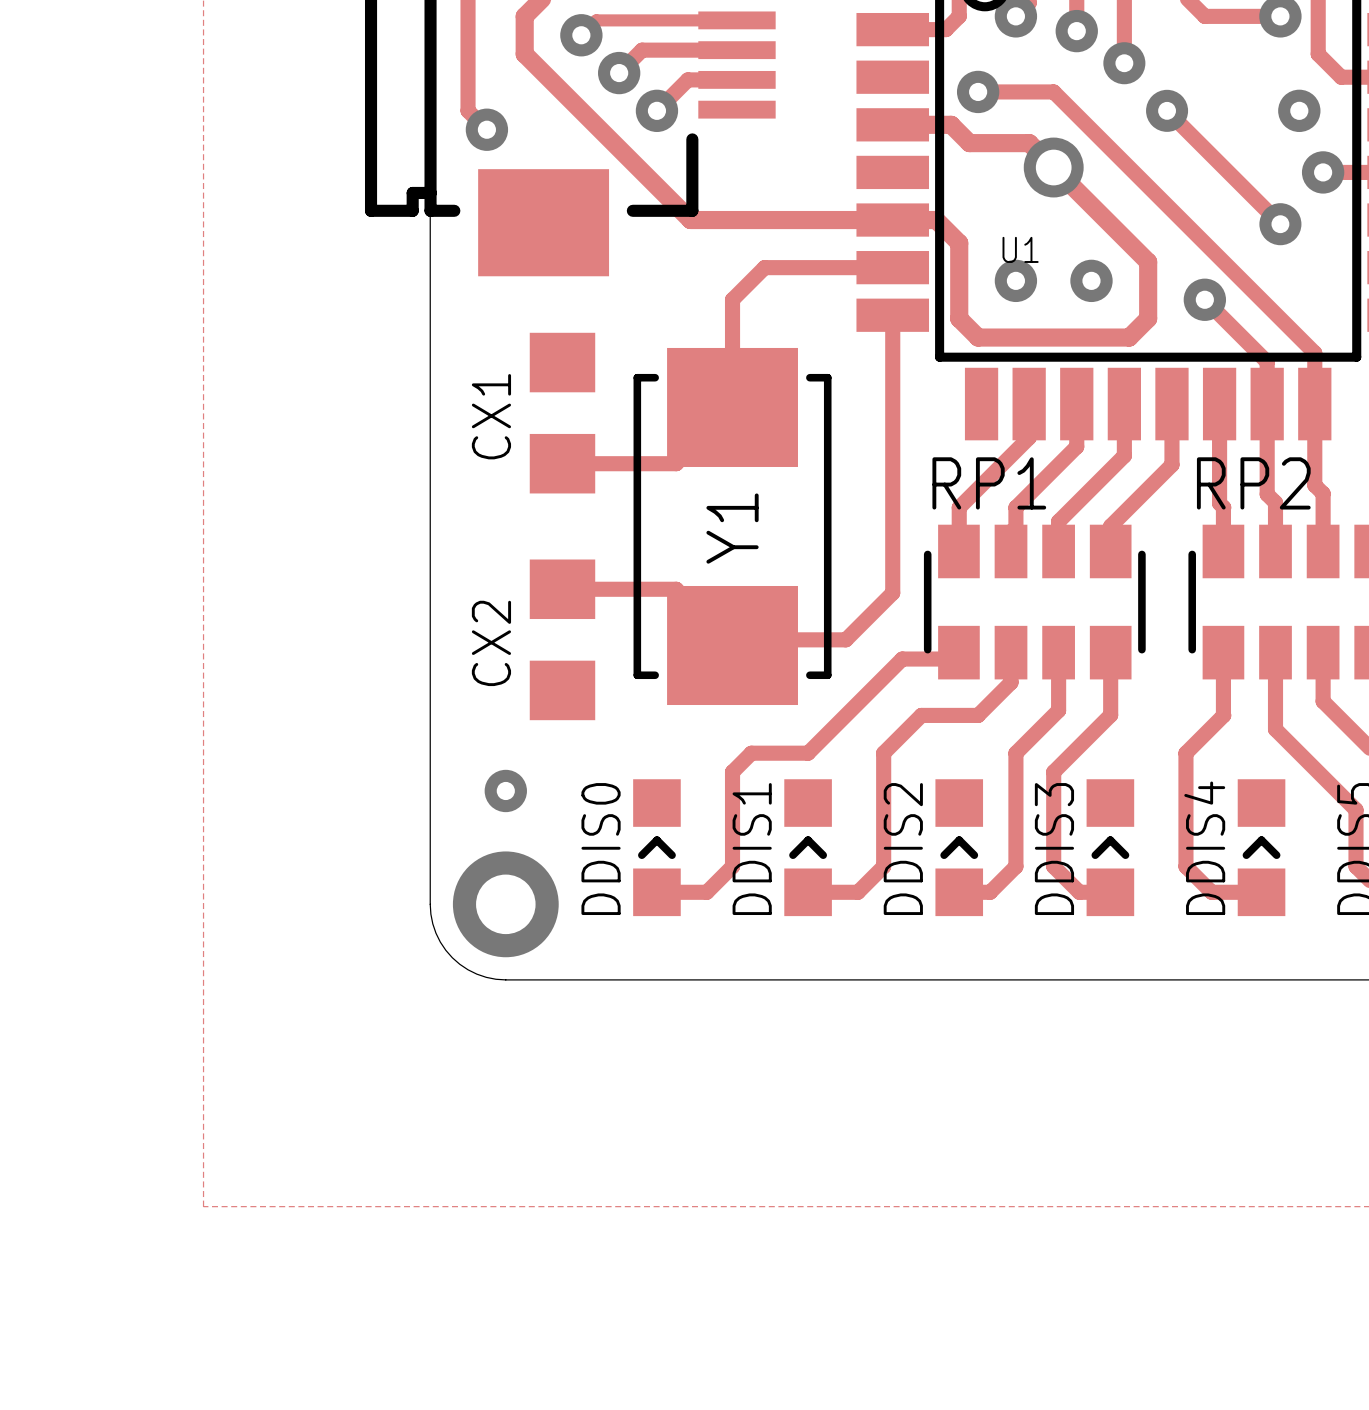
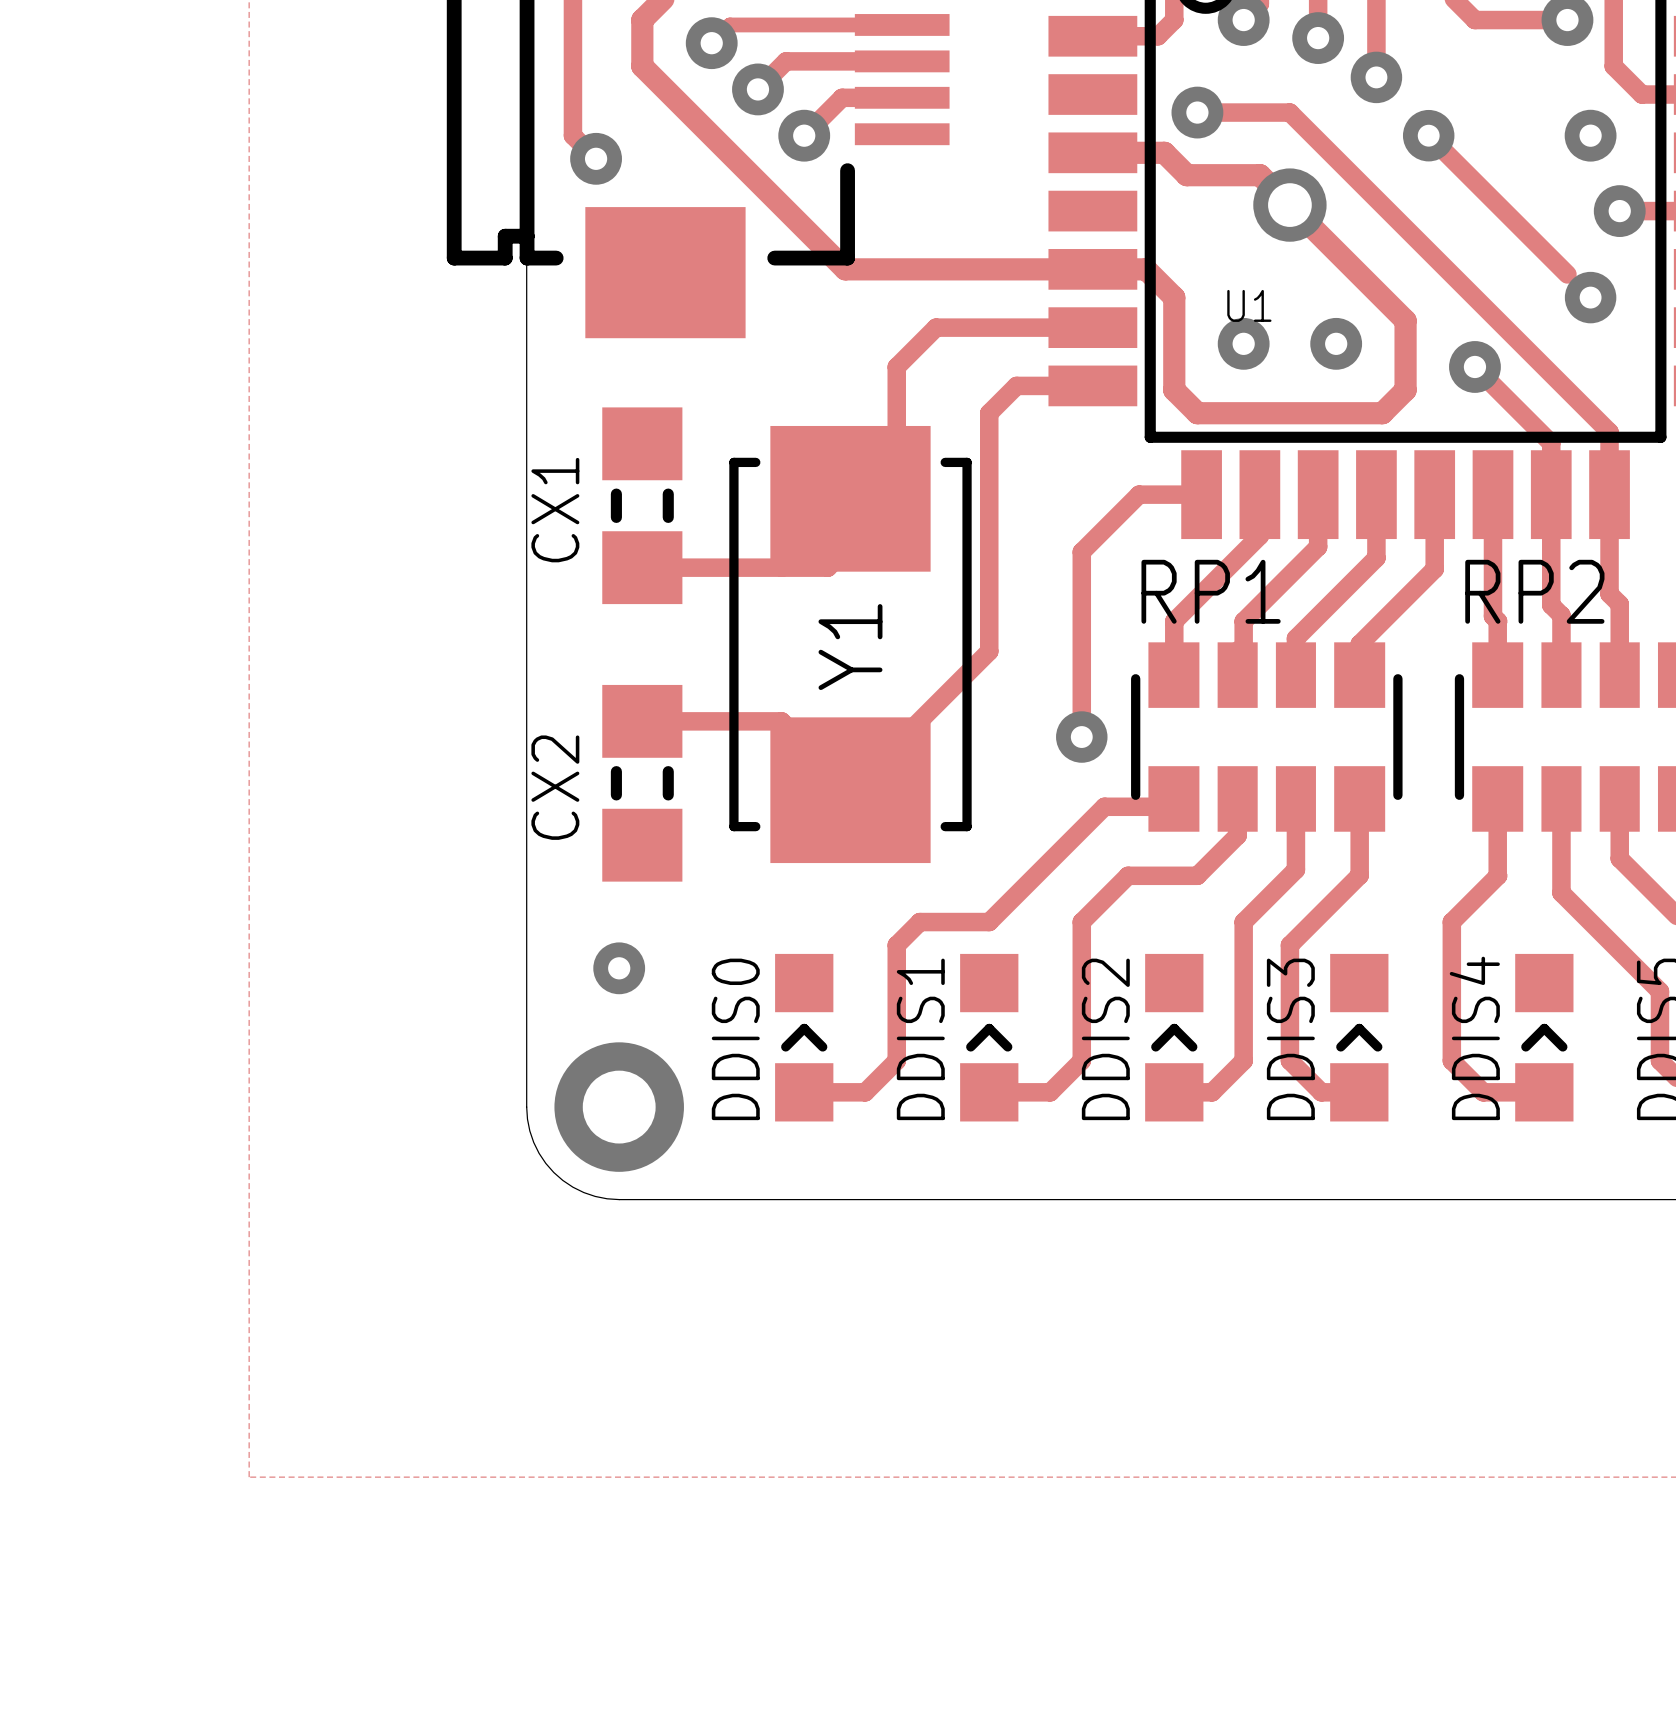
via position: (1280, 224) -> (1590, 297)
track: (892, 315) (892, 592) (845, 639) (738, 639) (732, 645) (676, 589) (638, 589) -> (1092, 385) (1016, 385) (989, 413) (989, 651) (850, 790) (781, 721)
CX1 footprint: [529, 332, 596, 494] -> [602, 407, 683, 605]
track: none -> (1201, 494) (1139, 494) (1081, 552) (1081, 737)
Y1 position: (732, 526) -> (850, 644)
CX2 footprint: [529, 559, 596, 721] -> [602, 684, 683, 882]
via: none -> (1081, 737)

